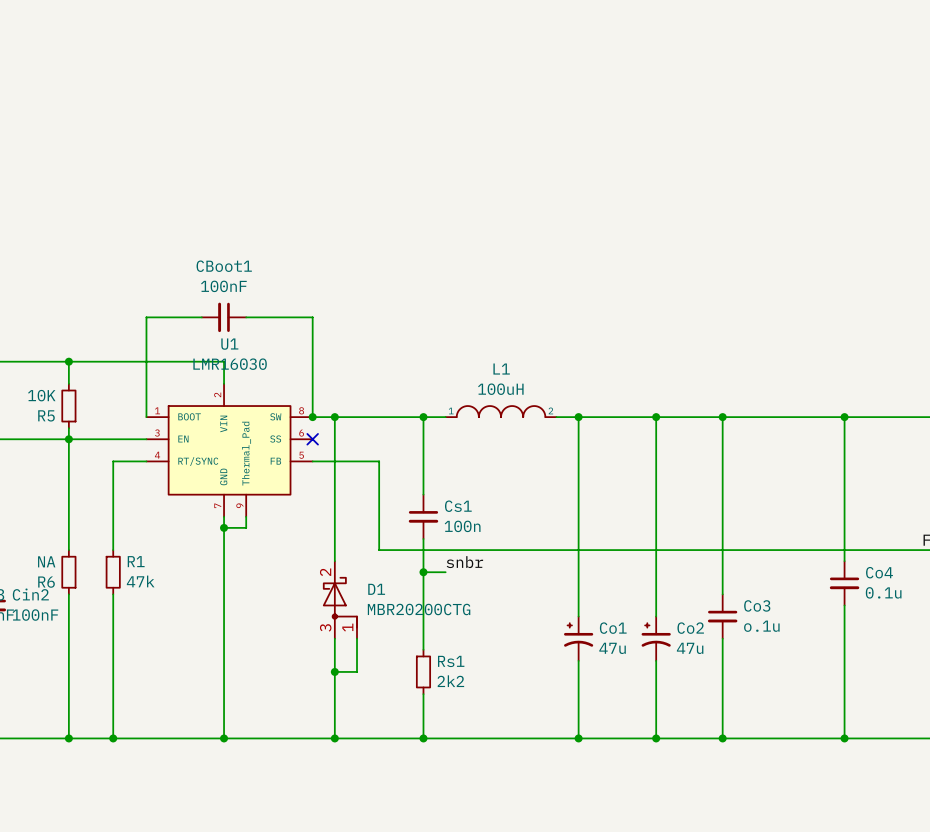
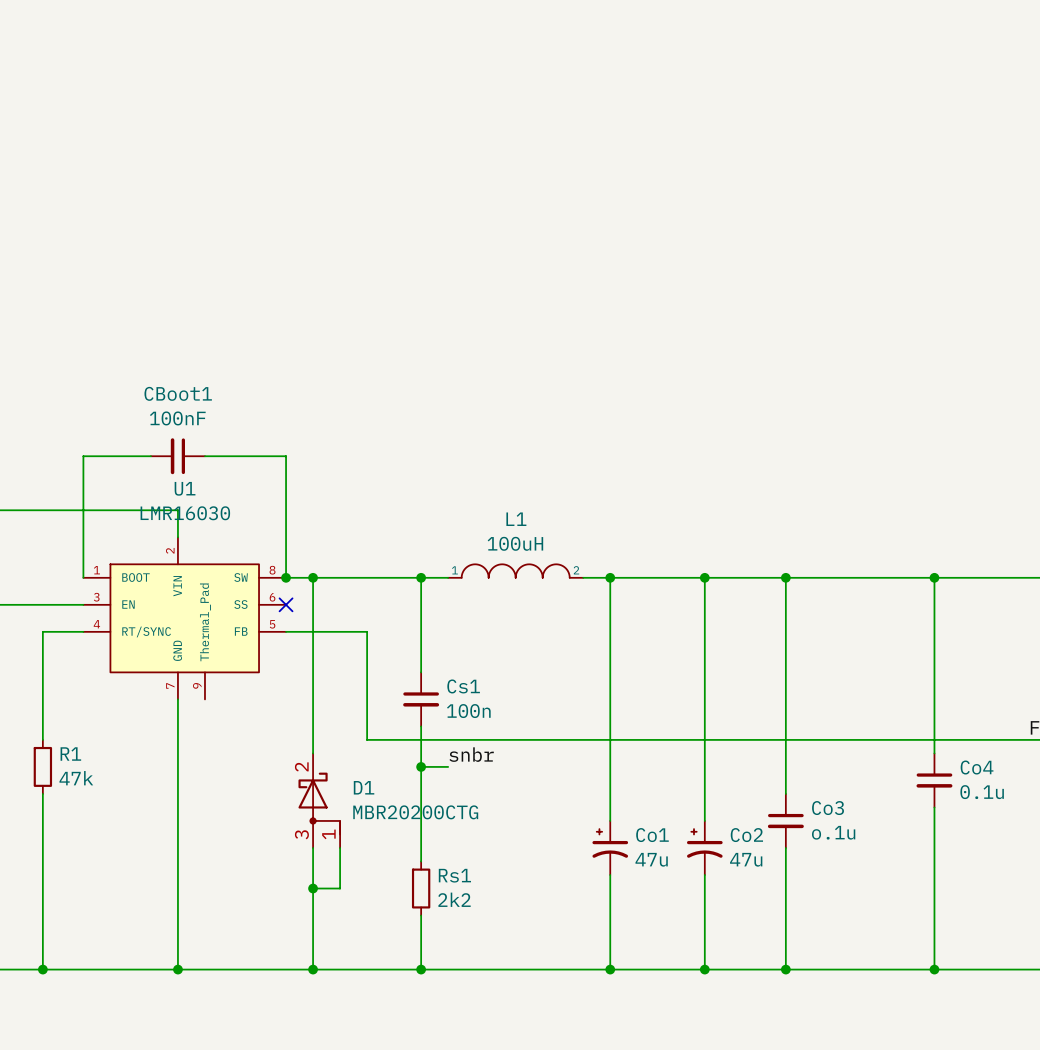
wire: (246, 516) (246, 527) (224, 527) -> none
junction: (224, 527) -> none

